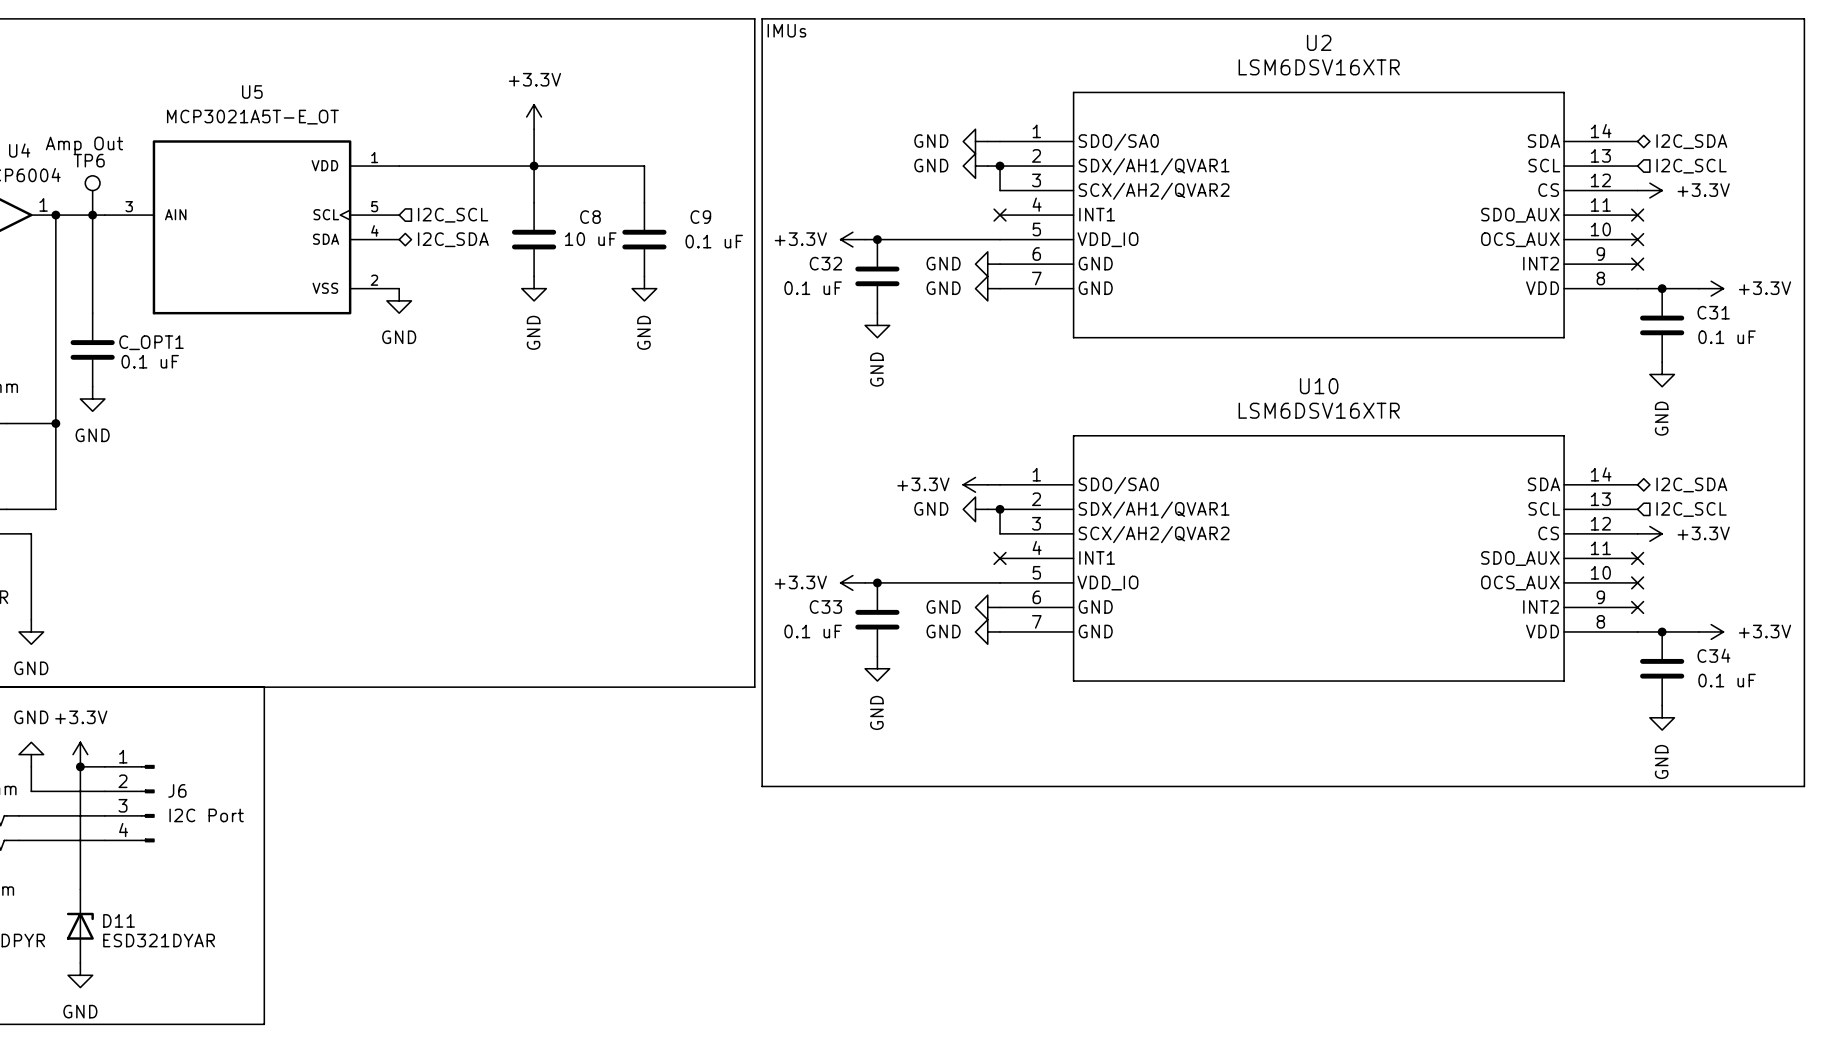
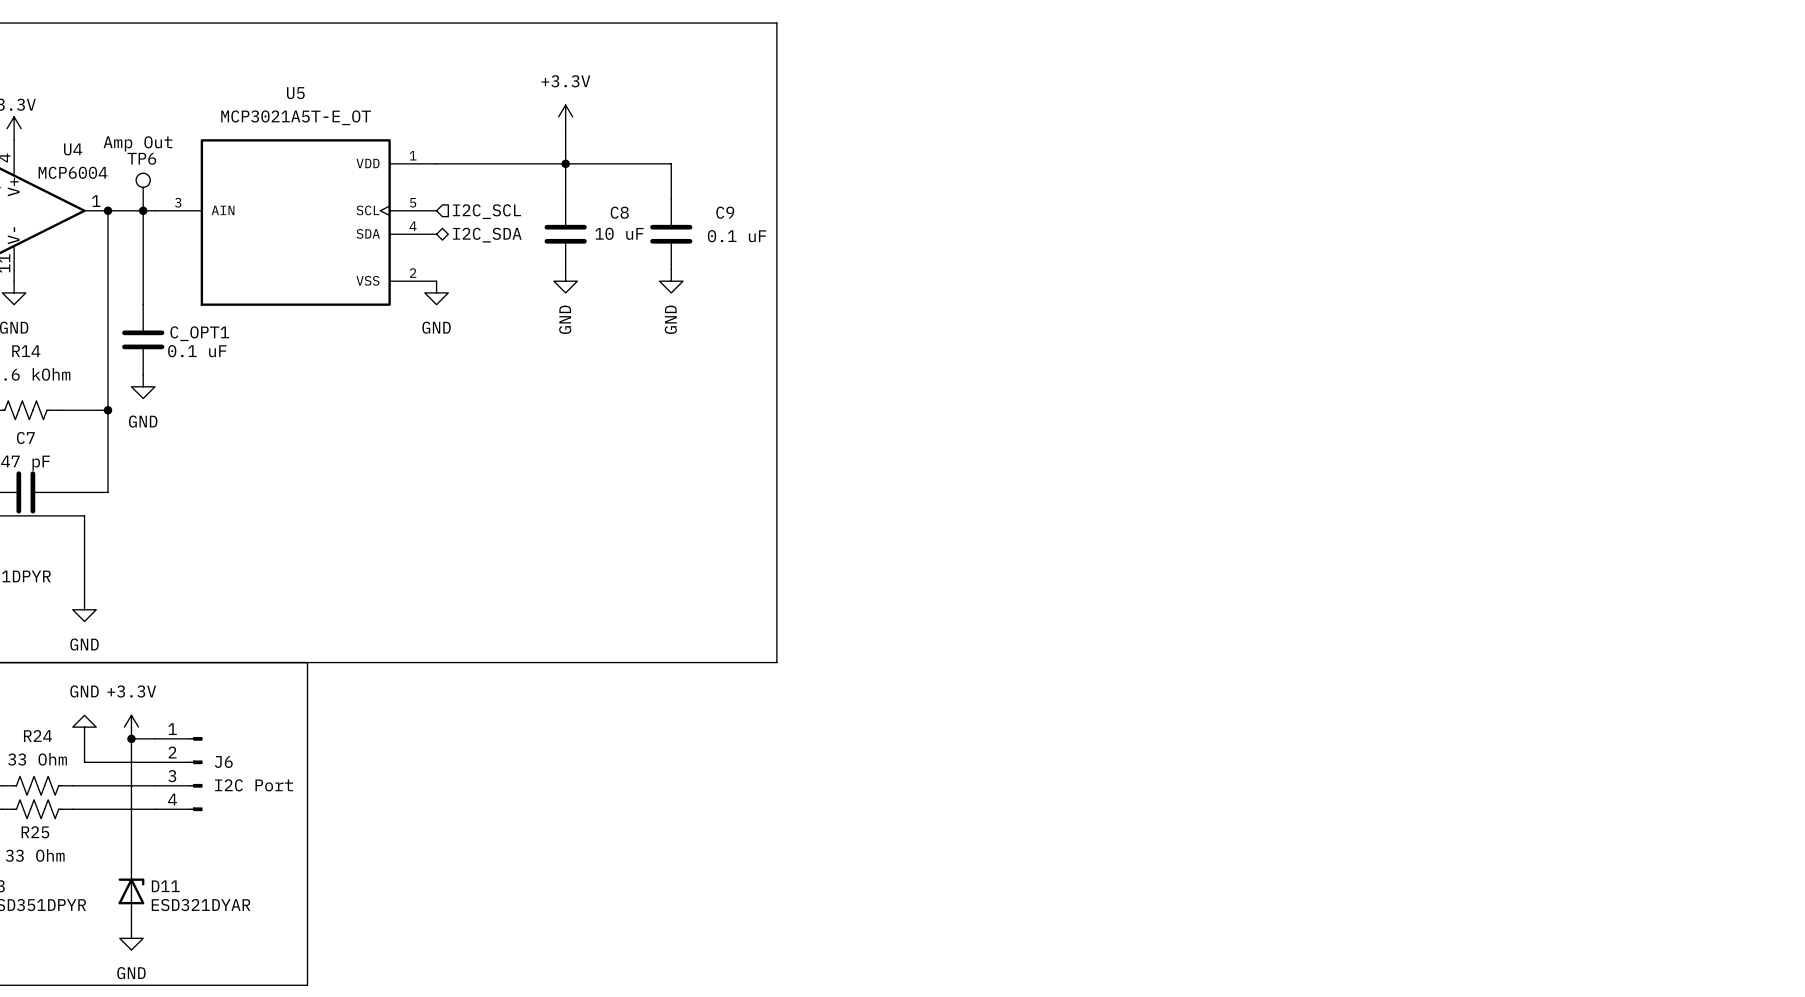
line: (762, 18) (1804, 18) (1804, 786) (762, 786) (762, 18) -> none
text: IMUs (786, 30) -> none
power symbol: GND (975, 141) -> none
wire: (987, 141) (1000, 141) -> none
hierarchical label: I2C_SDA (1691, 141) -> none
power symbol: GND (975, 166) -> none
wire: (987, 166) (1000, 166) (1000, 190) -> none
junction: (1000, 166) -> none
hierarchical label: I2C_SCL (1691, 166) -> none
power symbol: +3.3V (1649, 190) -> none
no-connect mark: (1000, 215) -> none
U2: LSM6DSV16XTR (1318, 215) -> none
no-connect mark: (1637, 215) -> none
power symbol: +3.3V (852, 239) -> none
wire: (865, 239) (1000, 239) -> none
junction: (877, 239) -> none
no-connect mark: (1637, 239) -> none
power symbol: GND (987, 264) -> none
no-connect mark: (1637, 264) -> none
C32: 0.1 uF (877, 276) -> none
power symbol: GND (987, 288) -> none
wire: (1637, 288) (1698, 288) -> none
junction: (1662, 288) -> none
power symbol: +3.3V (1711, 288) -> none
power symbol: GND (877, 325) -> none
C31: 0.1 uF (1662, 325) -> none
power symbol: GND (1662, 374) -> none
power symbol: +3.3V (975, 484) -> none
wire: (987, 484) (1000, 484) -> none
hierarchical label: I2C_SDA (1691, 484) -> none
power symbol: GND (975, 509) -> none
wire: (987, 509) (1000, 509) (1000, 533) -> none
junction: (1000, 509) -> none
hierarchical label: I2C_SCL (1691, 509) -> none
power symbol: +3.3V (1649, 533) -> none
no-connect mark: (1000, 558) -> none
U10: LSM6DSV16XTR (1318, 558) -> none
no-connect mark: (1637, 558) -> none
power symbol: +3.3V (852, 582) -> none
wire: (865, 582) (1000, 582) -> none
junction: (877, 582) -> none
no-connect mark: (1637, 582) -> none
power symbol: GND (987, 607) -> none
no-connect mark: (1637, 607) -> none
C33: 0.1 uF (877, 619) -> none
power symbol: GND (987, 631) -> none
wire: (1637, 631) (1698, 631) -> none
junction: (1662, 631) -> none
power symbol: +3.3V (1711, 631) -> none
power symbol: GND (877, 668) -> none
C34: 0.1 uF (1662, 668) -> none
power symbol: GND (1662, 717) -> none

